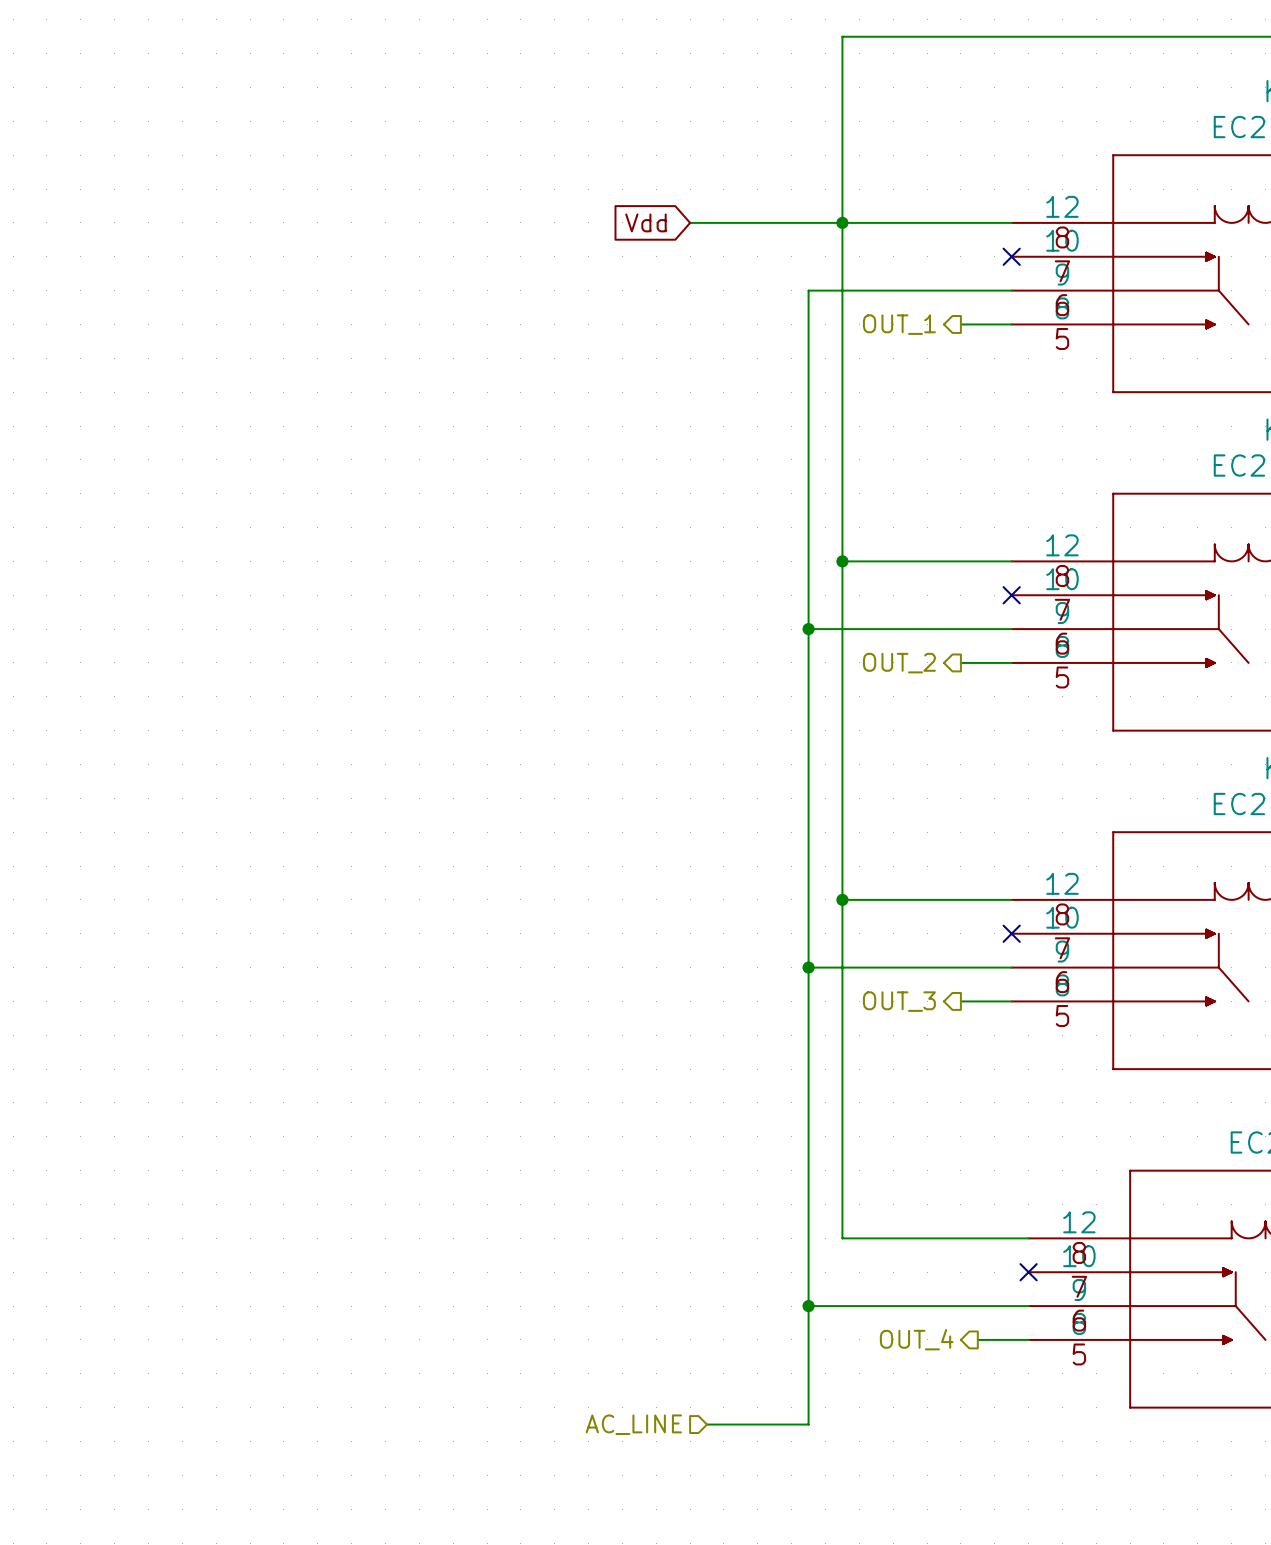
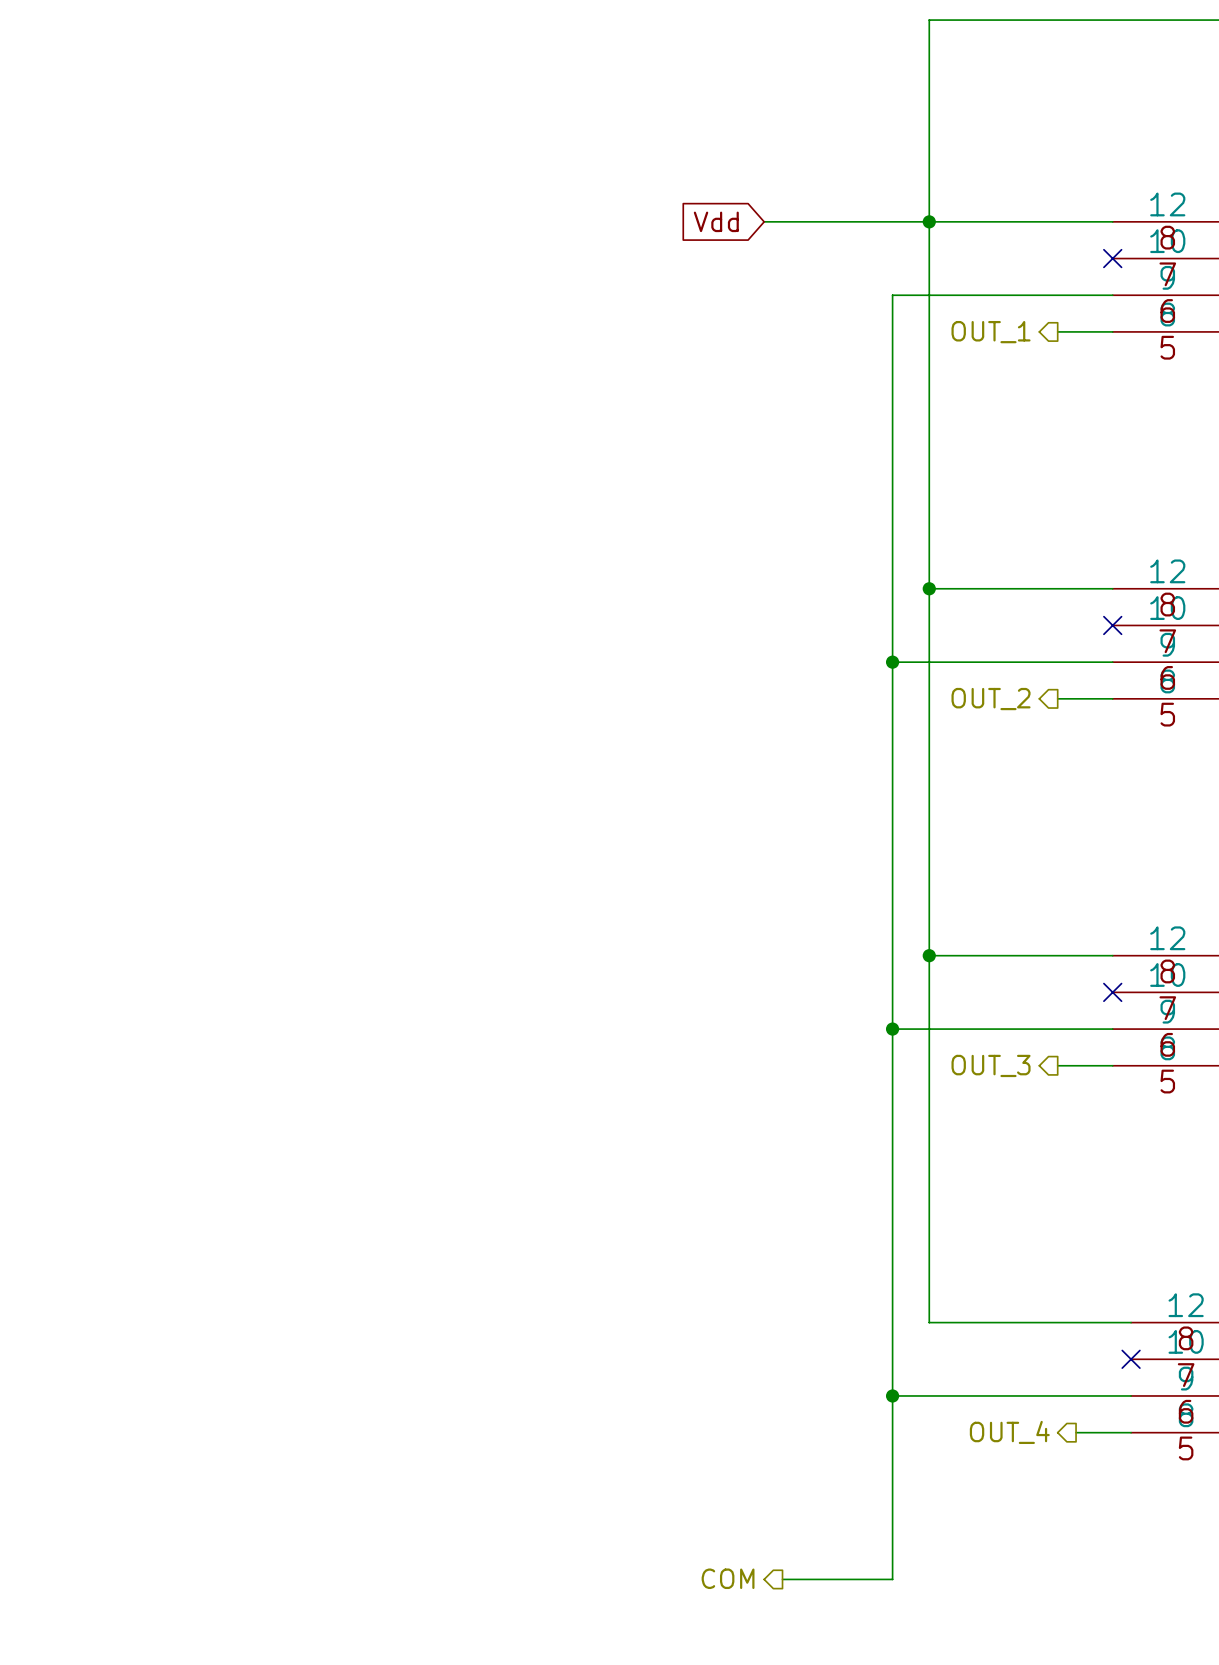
hierarchical label: AC_LINE (633, 1424) -> none
wire: (707, 1424) (808, 1424) -> (782, 1579) (892, 1579) (892, 1524)
hierarchical label: none -> COM (728, 1578)

